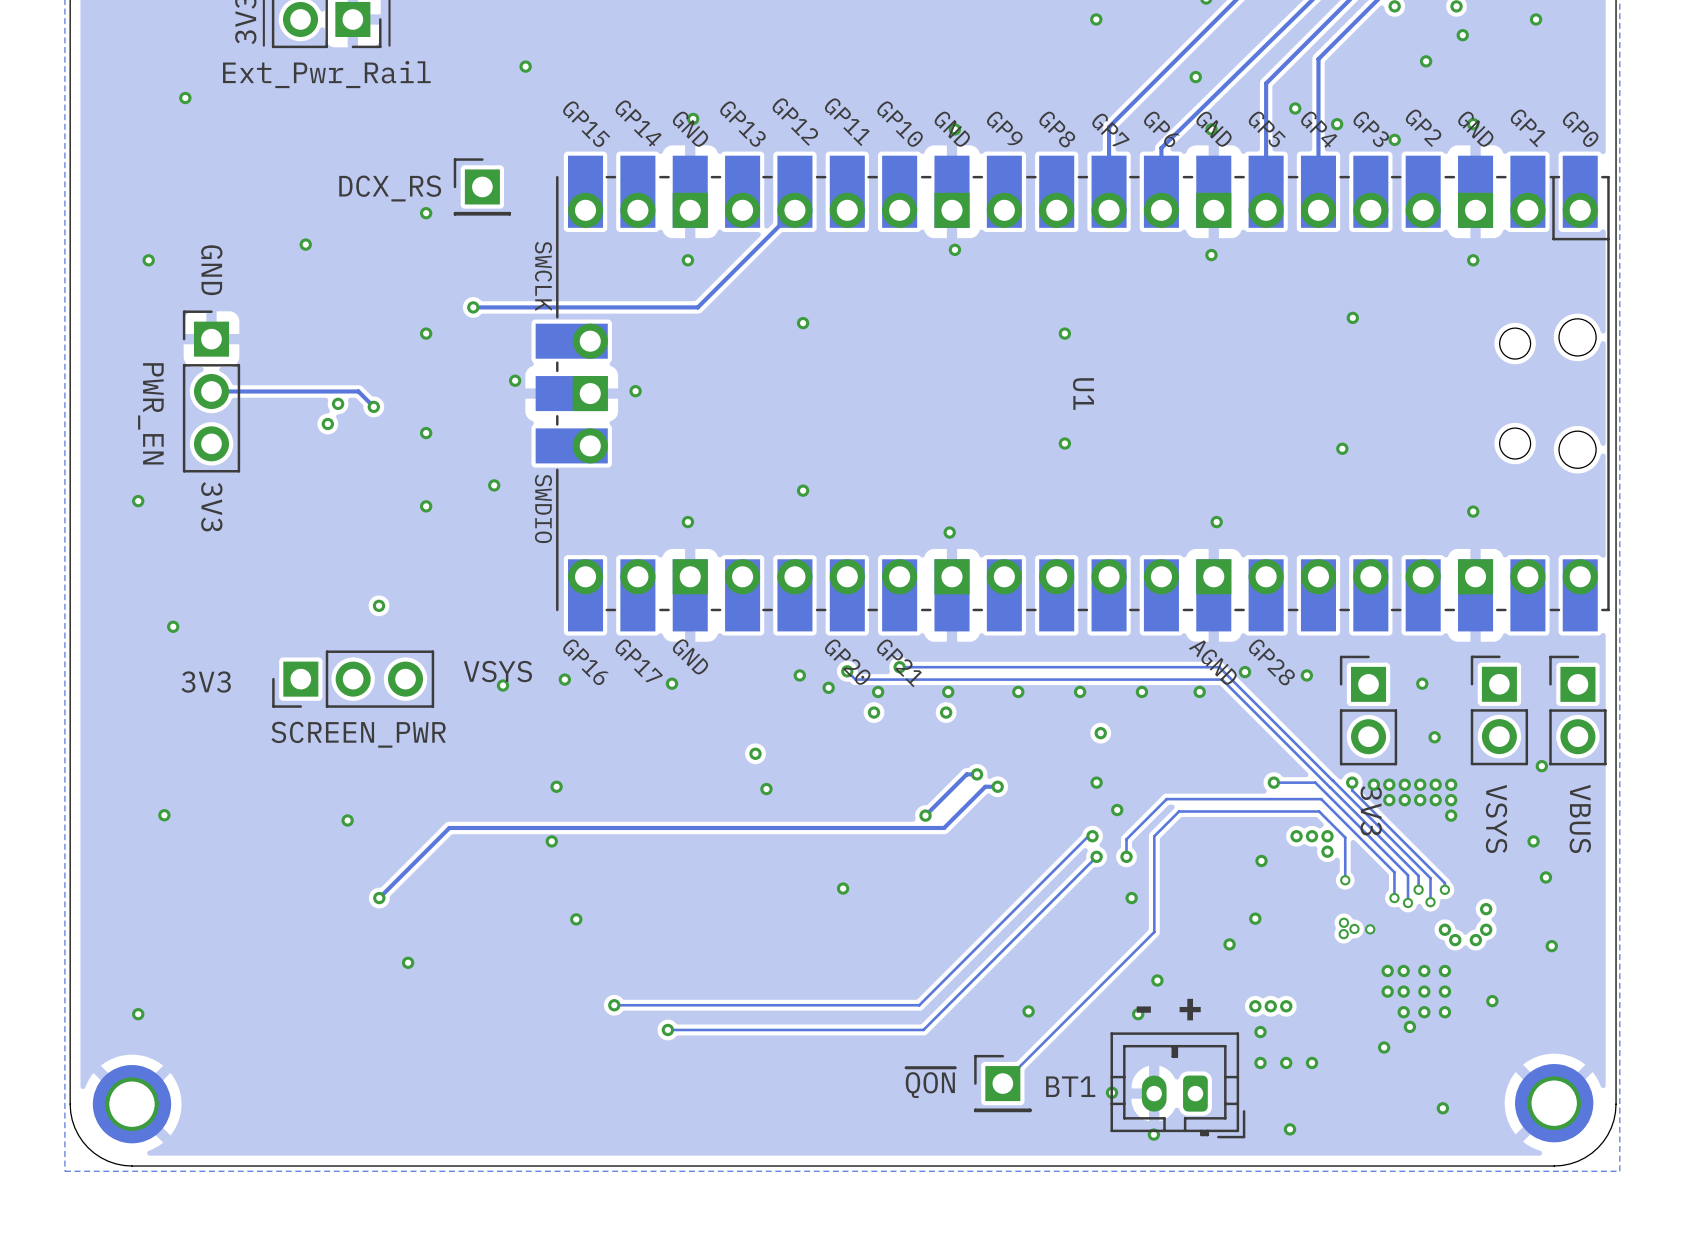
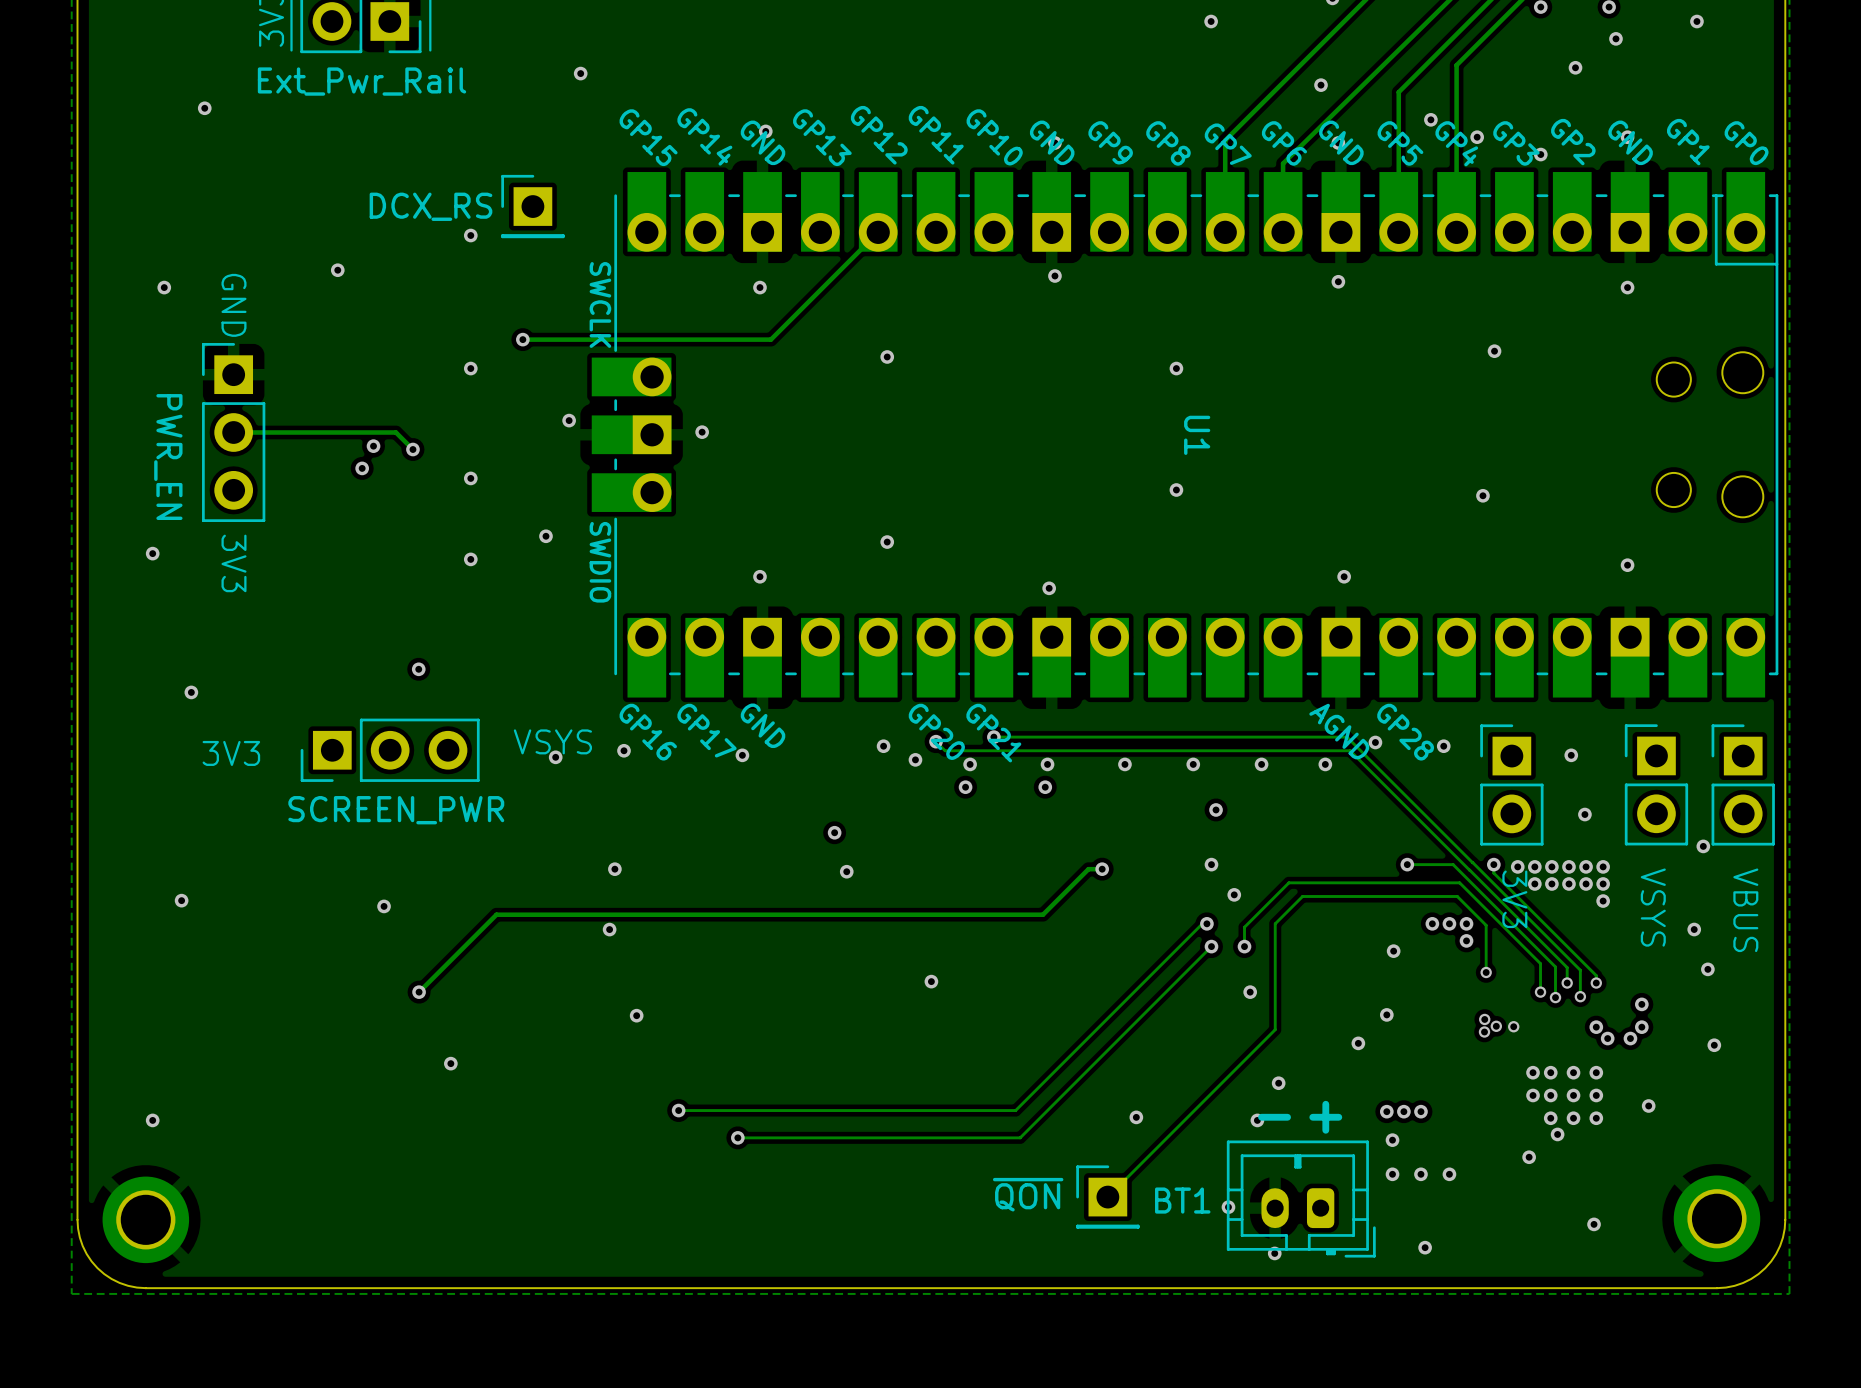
track: (977, 774) (966, 774) (925, 815) -> none
via: (977, 774) -> none
via: (925, 815) -> none

